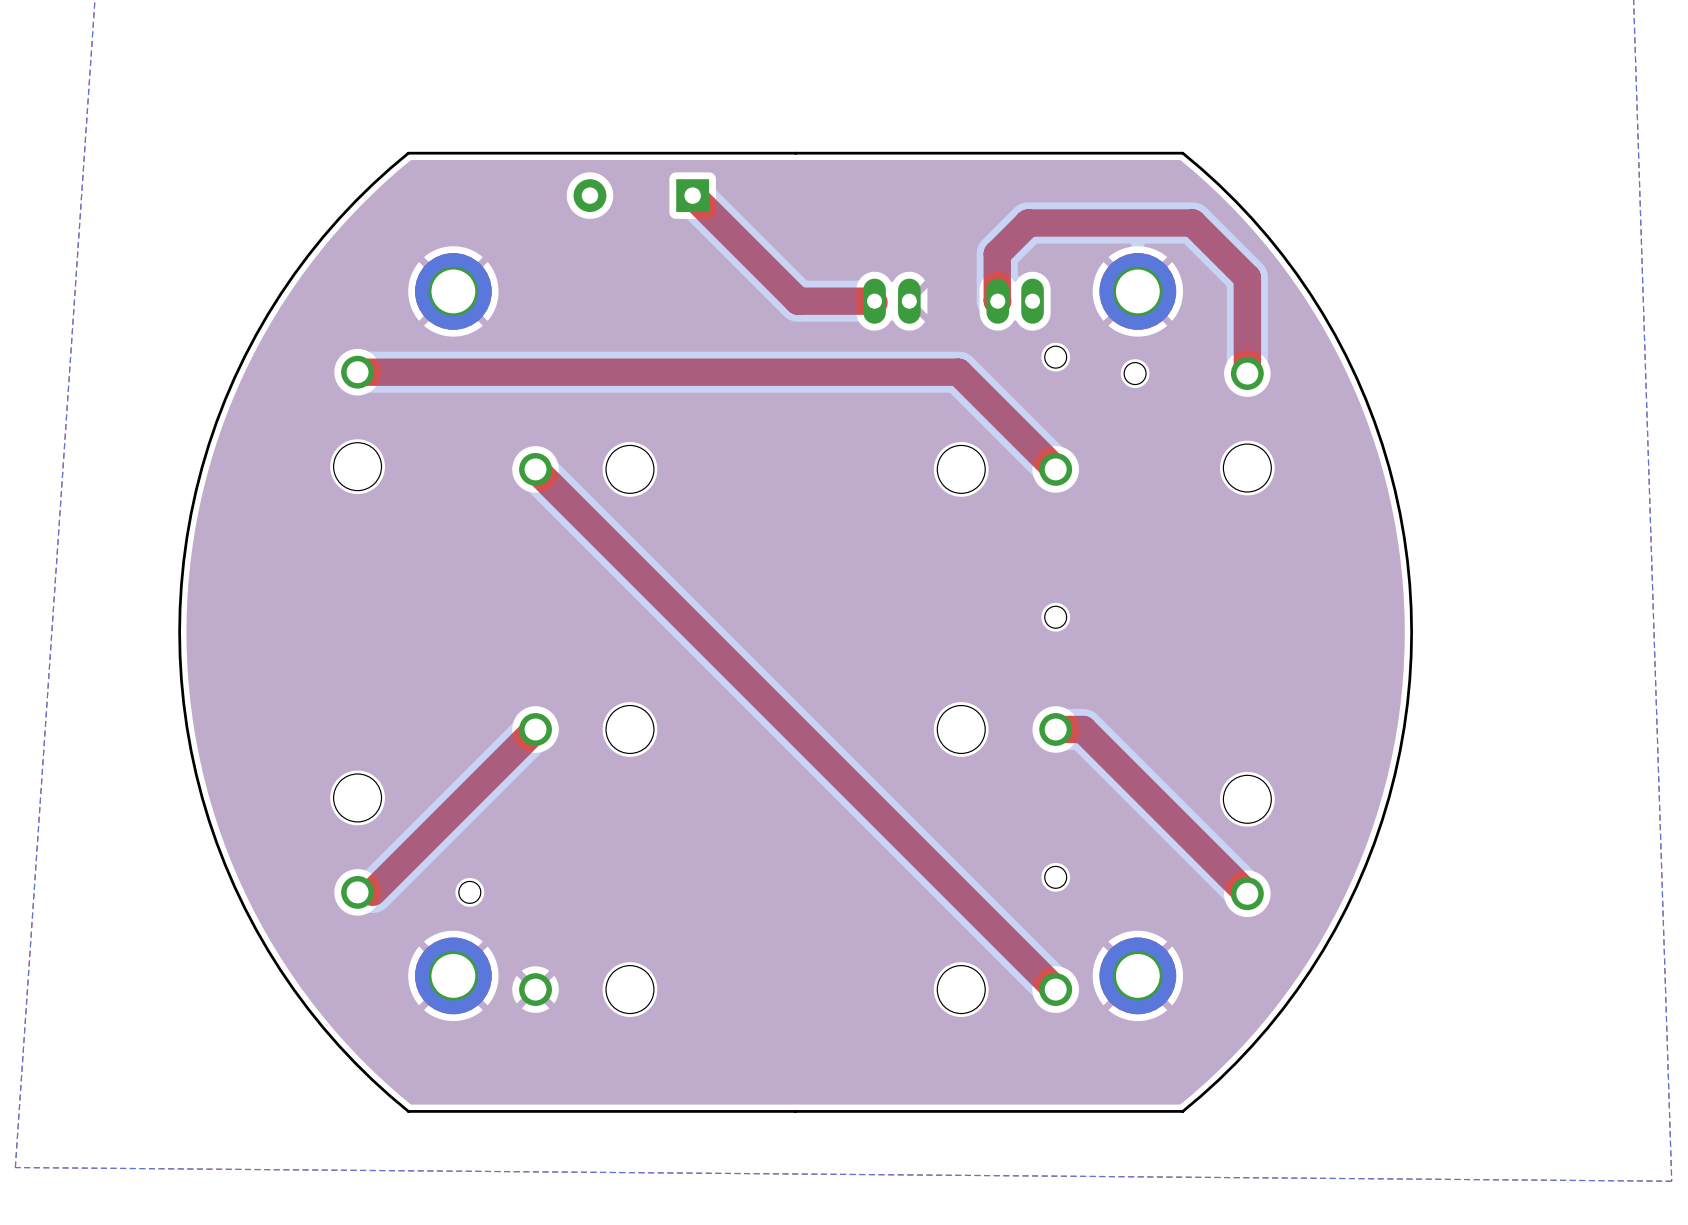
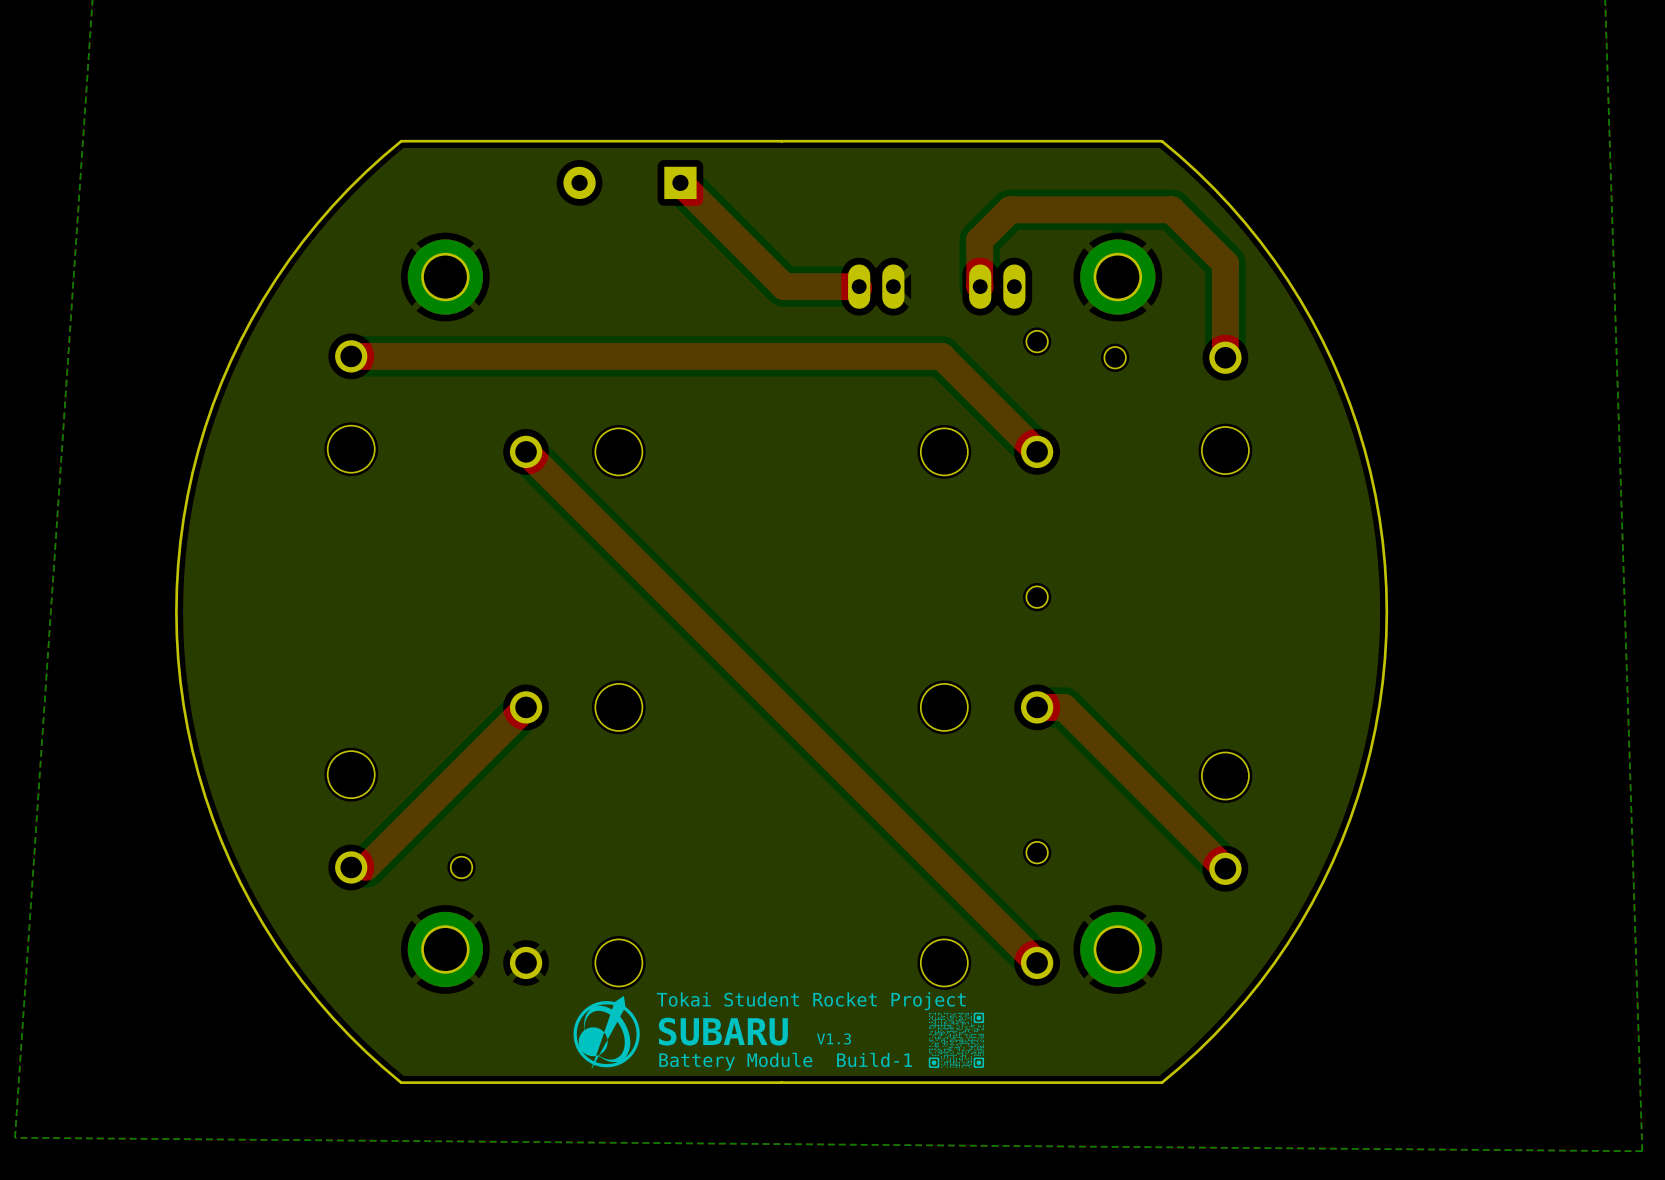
drawing: none -> [573, 995, 640, 1069]
text: none -> Tokai Student Rocket Project (811, 1001)
drawing: none -> [928, 1012, 985, 1068]
text: none -> SUBARU (723, 1031)
text: none -> V1.3 (833, 1038)
text: none -> Battery Module Build-1 (785, 1061)

